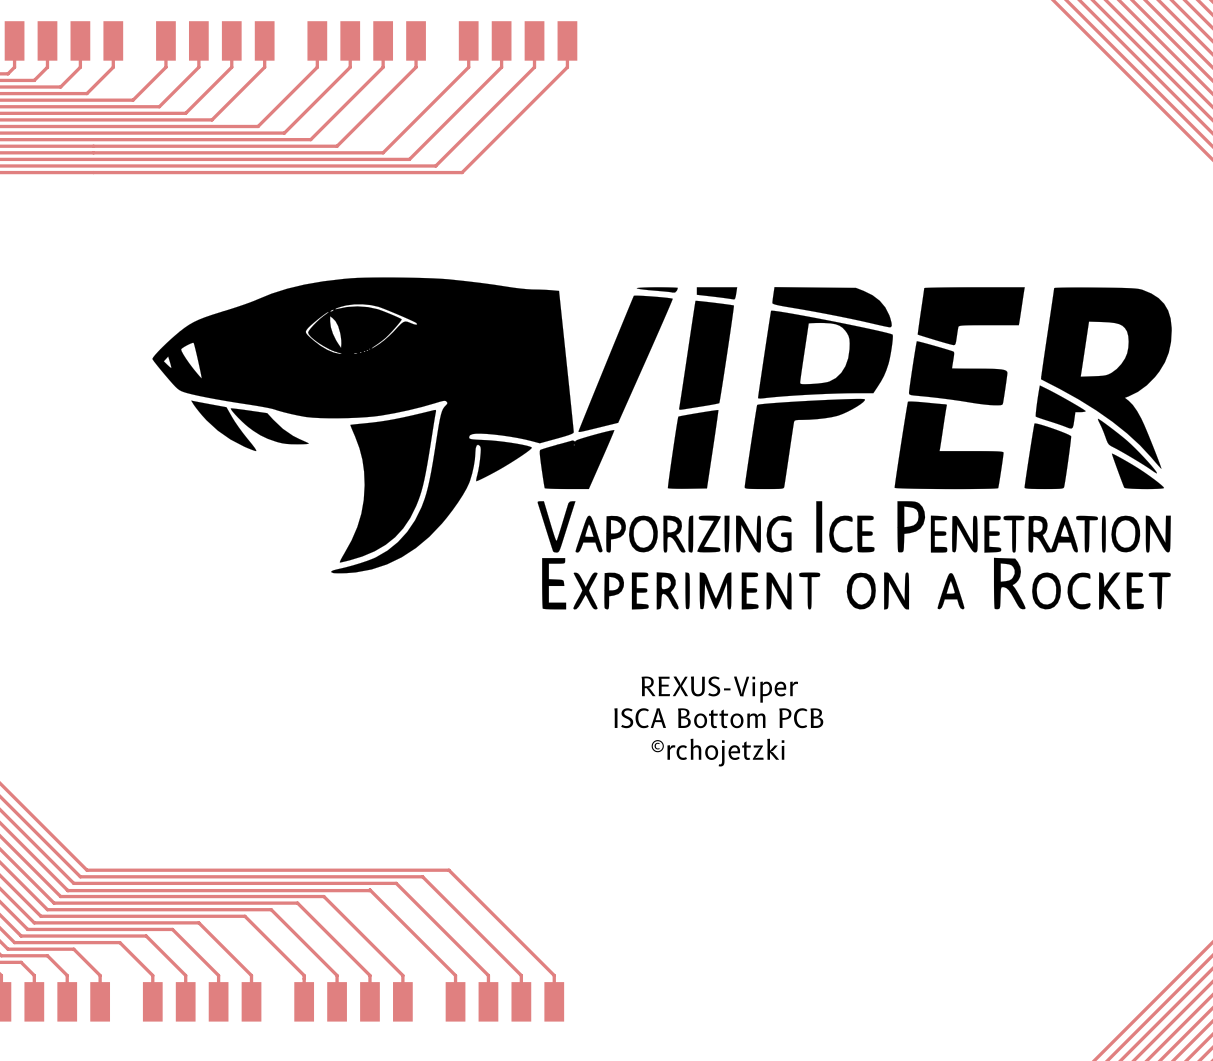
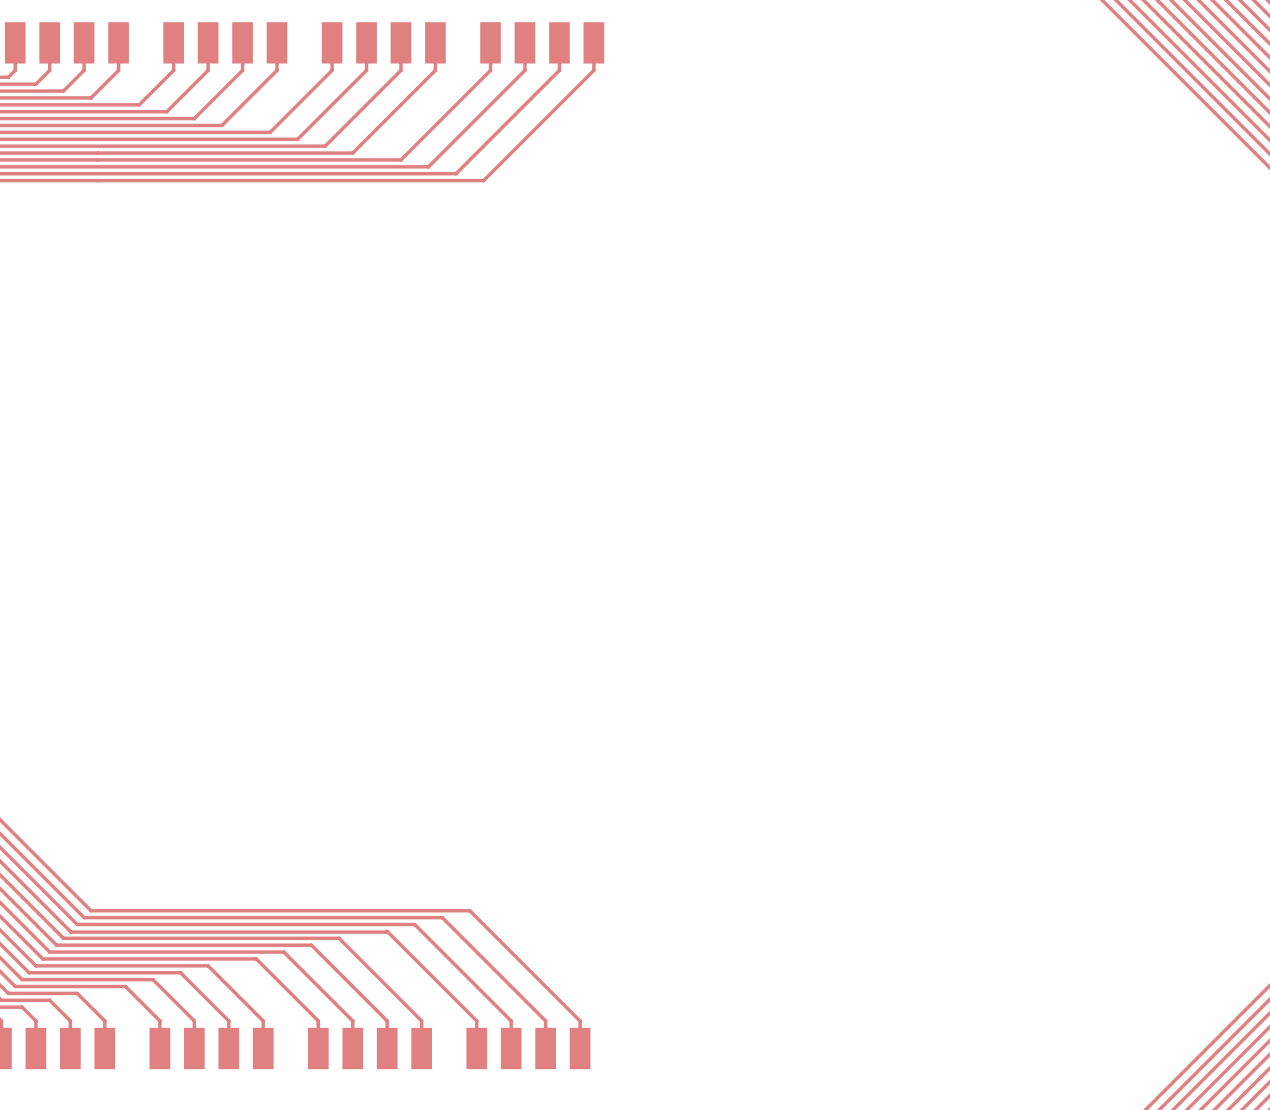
drawing: [152, 277, 1172, 610] -> none
text: REXUS-Viper (719, 689) -> none
text: ISCA Bottom PCB (718, 718) -> none
text: ©rchojetzki (718, 752) -> none

